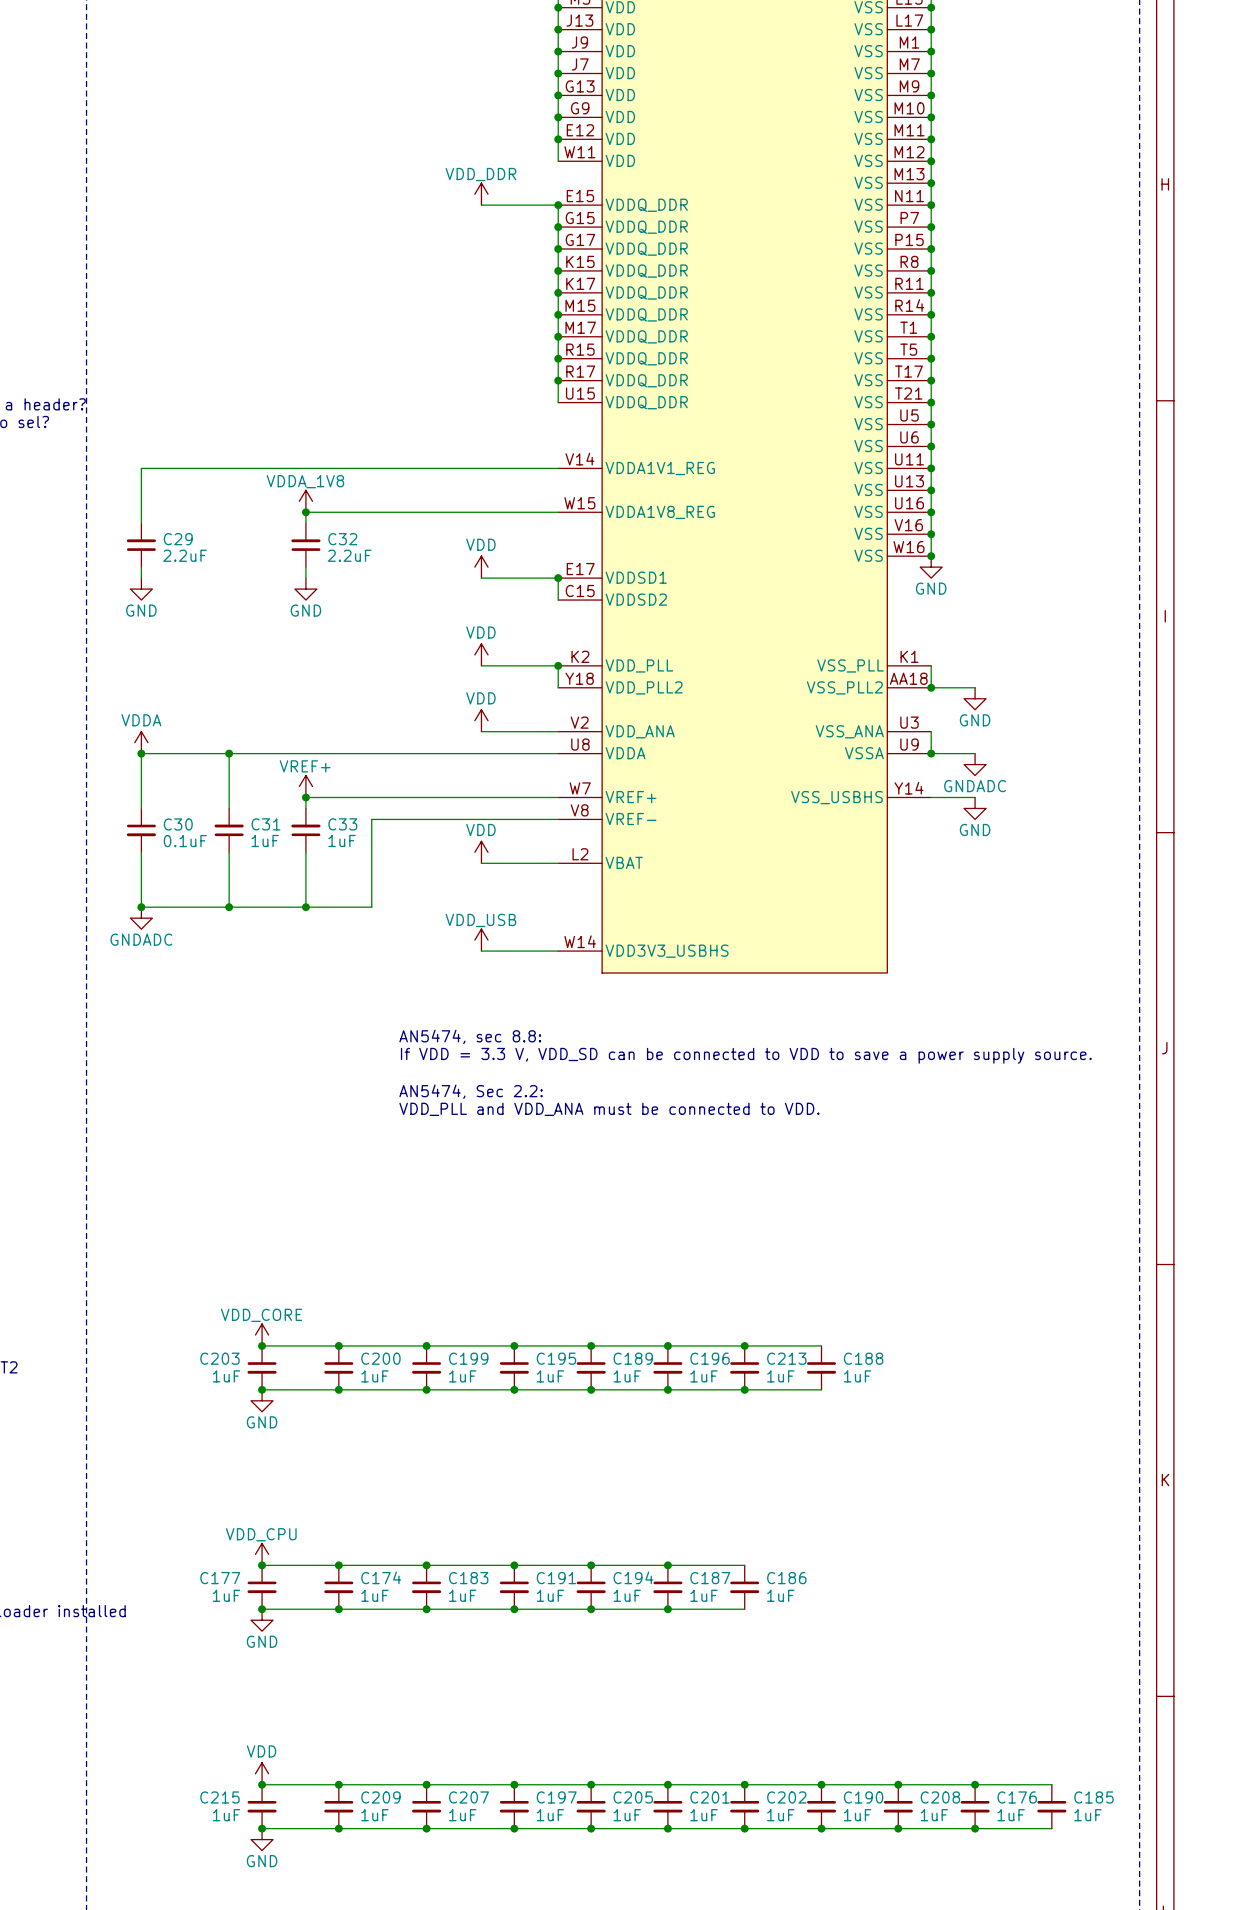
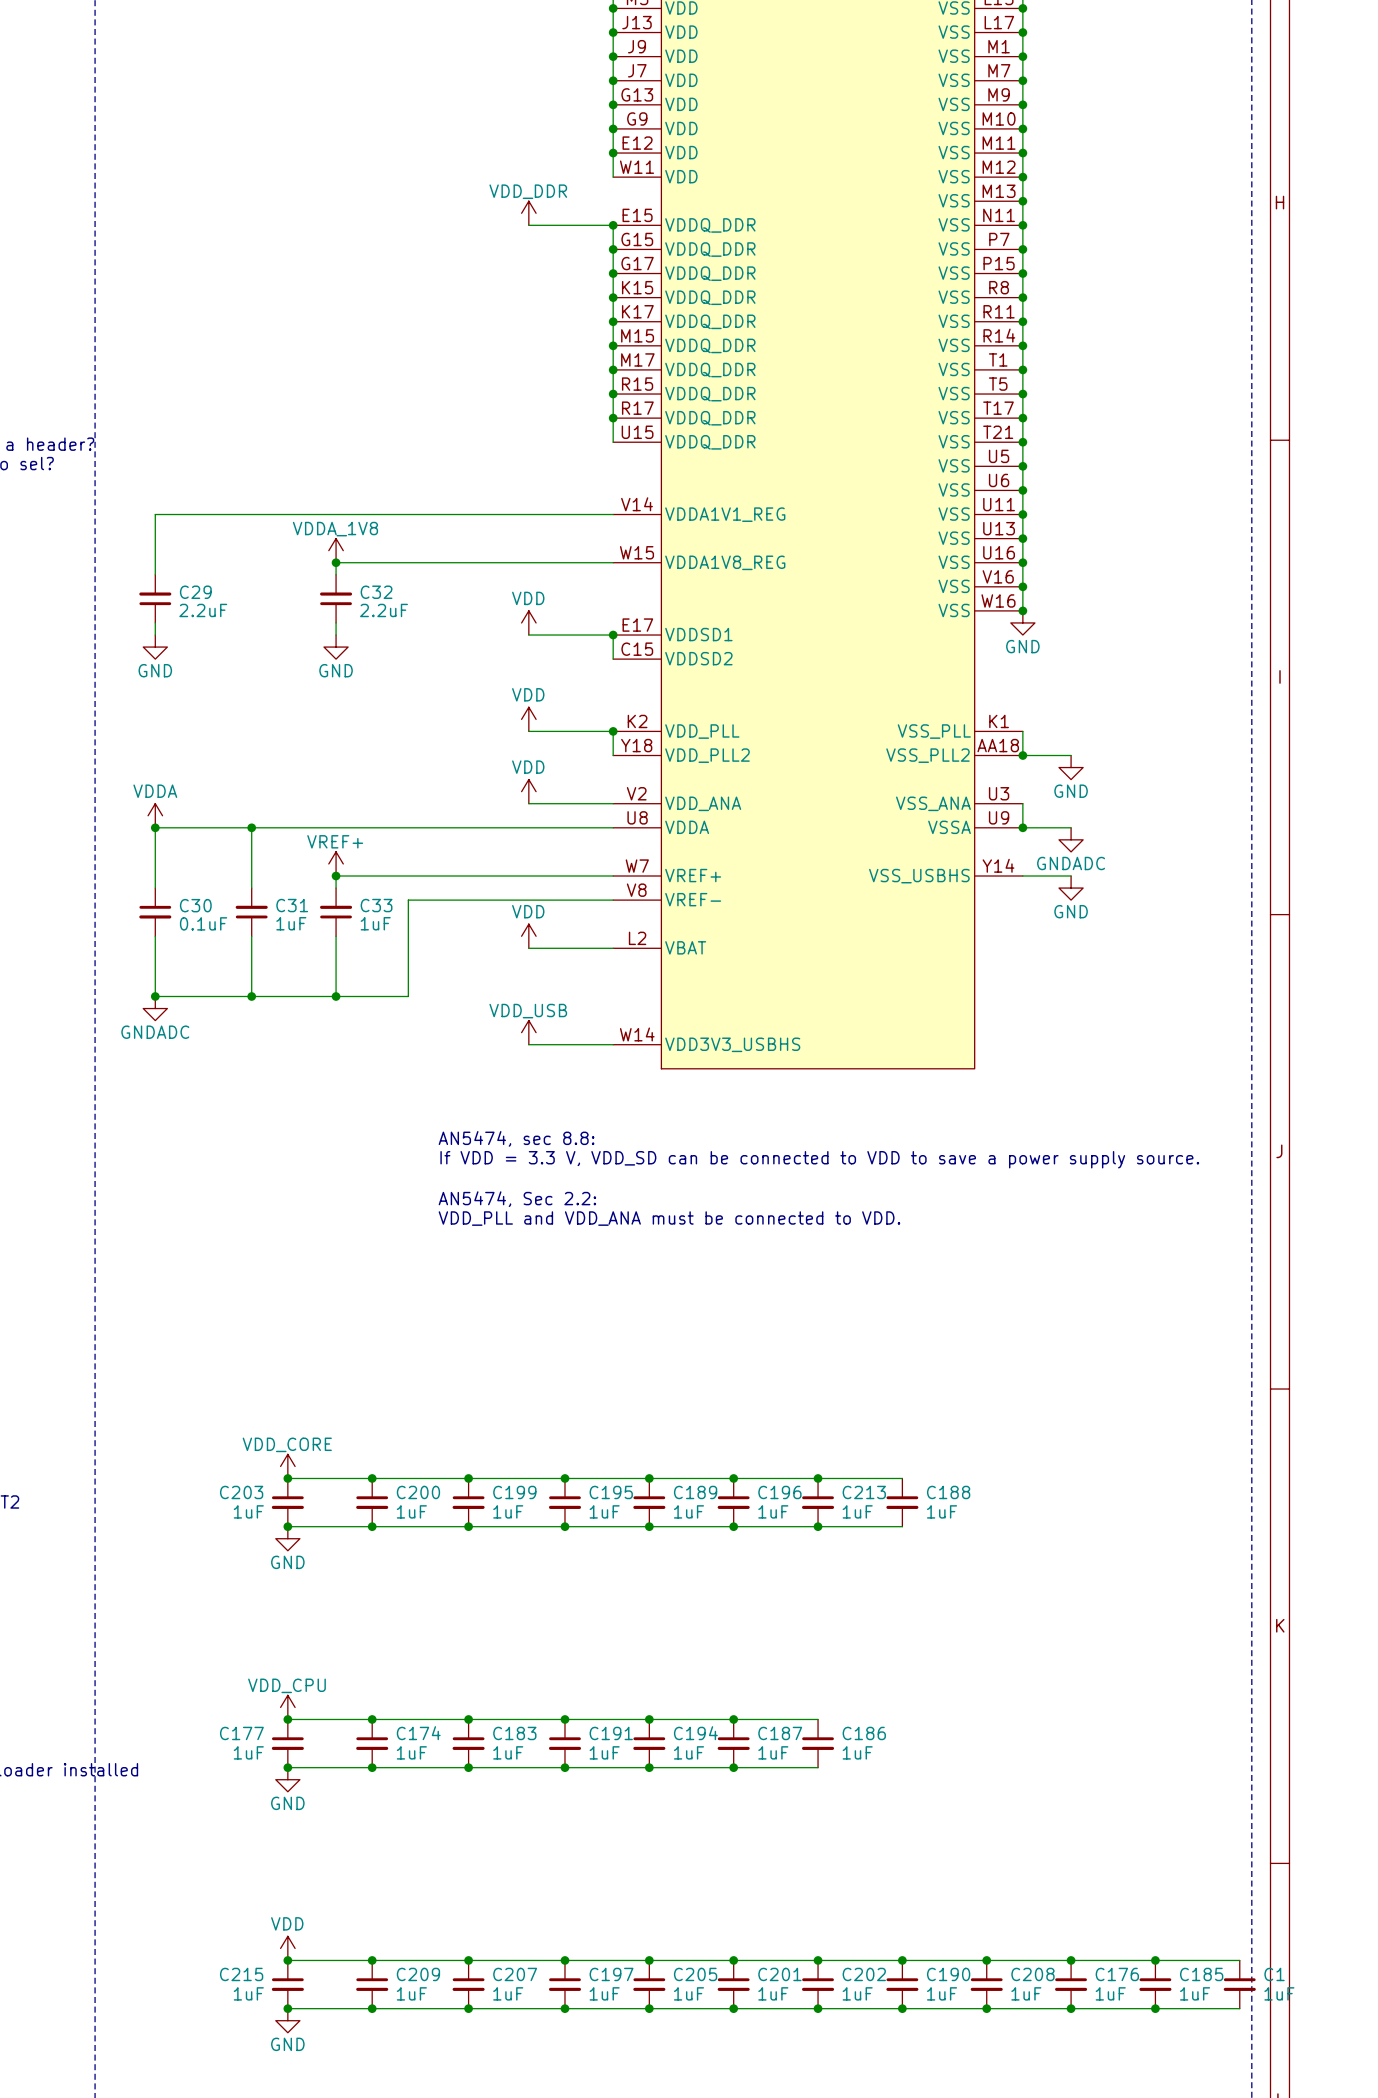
wire: none -> (1155, 1960) (1239, 1960)
junction: none -> (1155, 1960)
C1: none -> (1239, 1984)
wire: none -> (1155, 2008) (1239, 2008)
junction: none -> (1155, 2008)

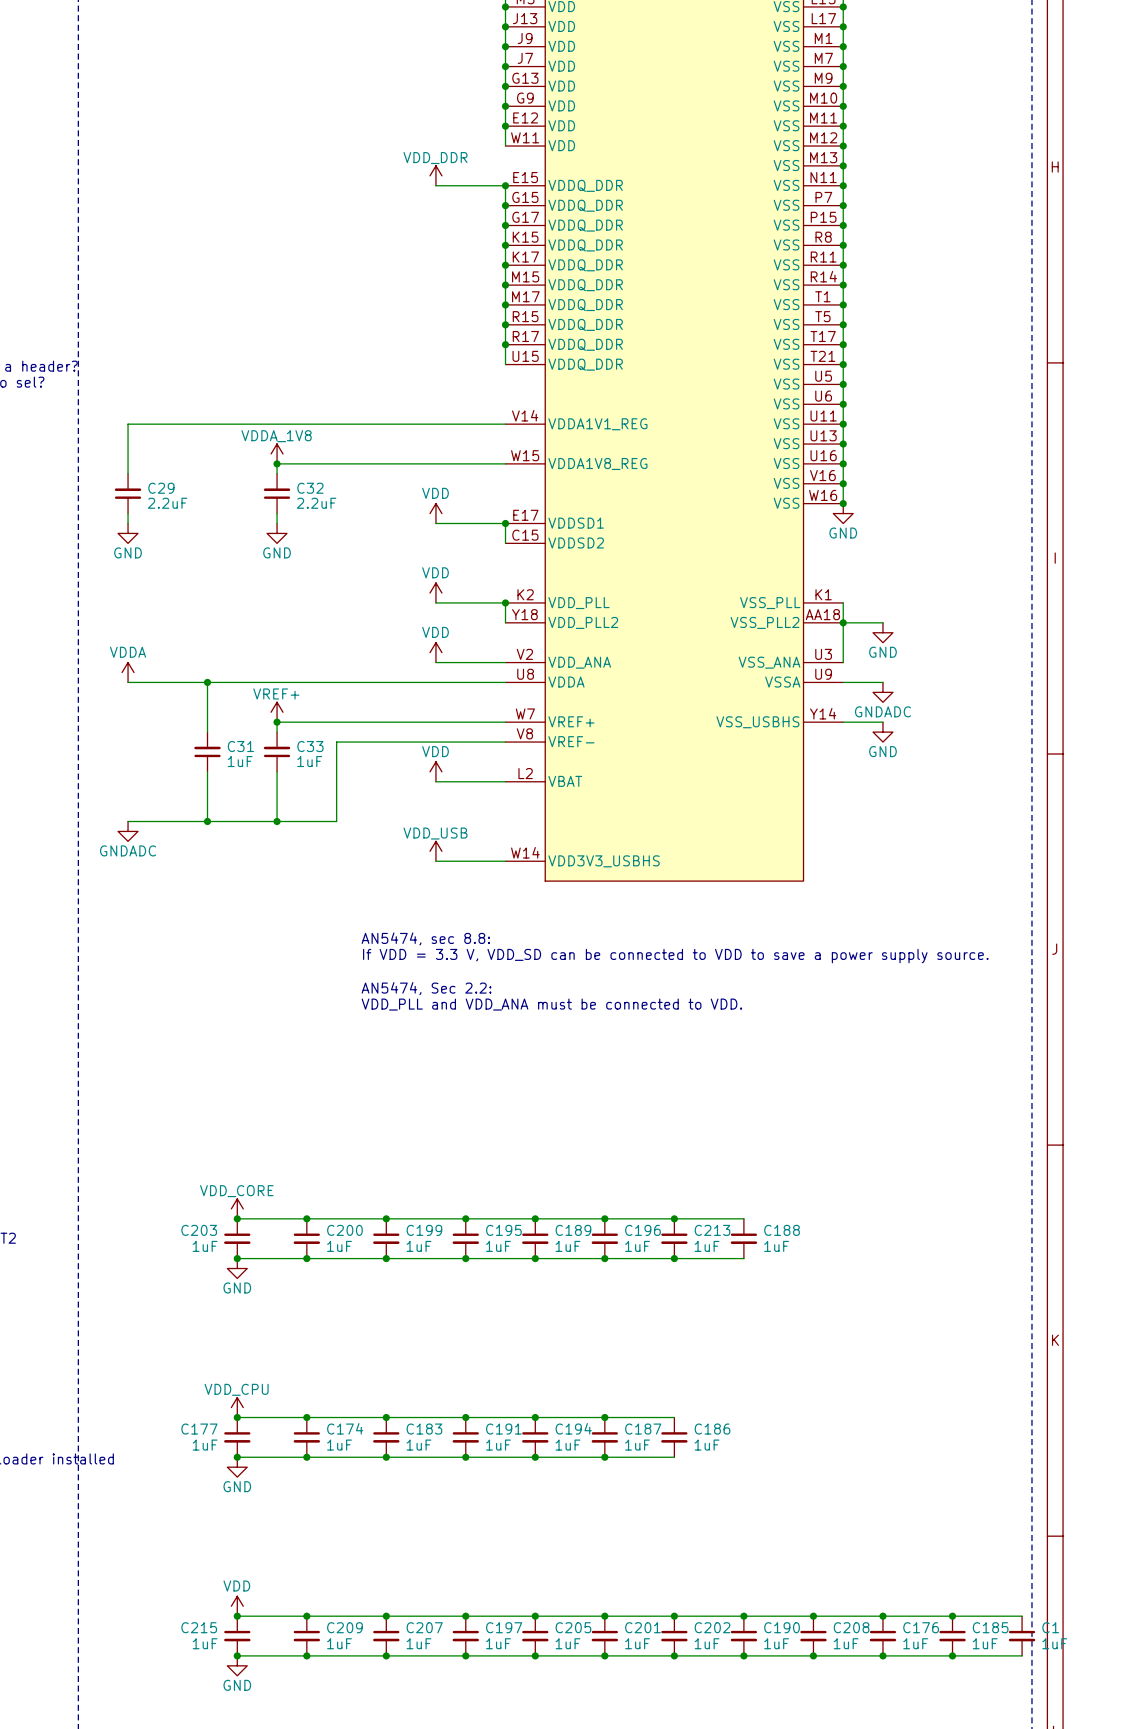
wire: (1022, 803) (1022, 827) -> (843, 662) (843, 622)
wire: (155, 827) (155, 888) -> none
junction: (155, 827) -> none
junction: (1022, 827) -> none
C30: (155, 912) -> none
wire: (155, 936) (155, 996) -> none
junction: (155, 996) -> none

